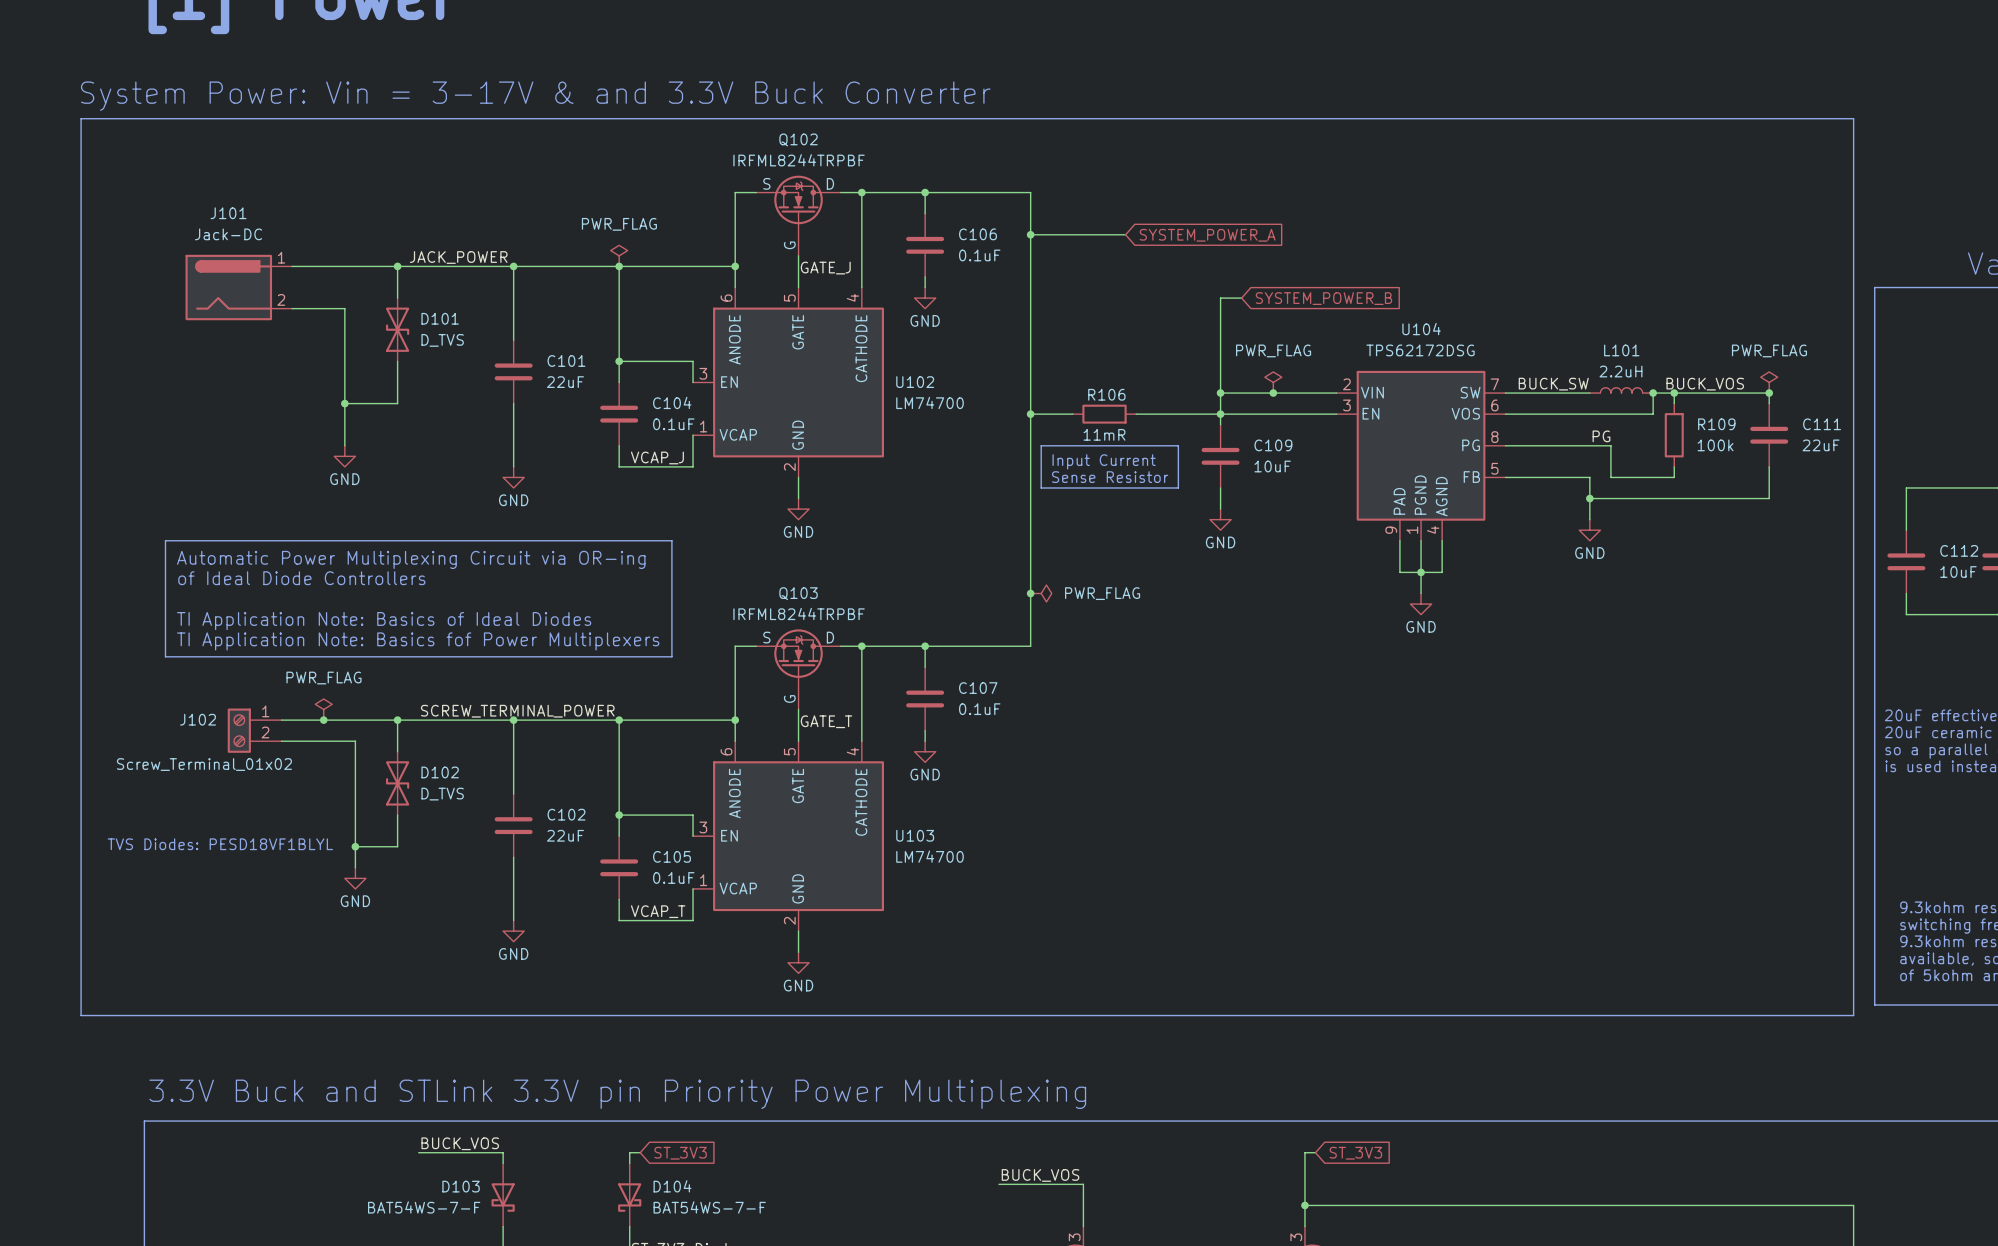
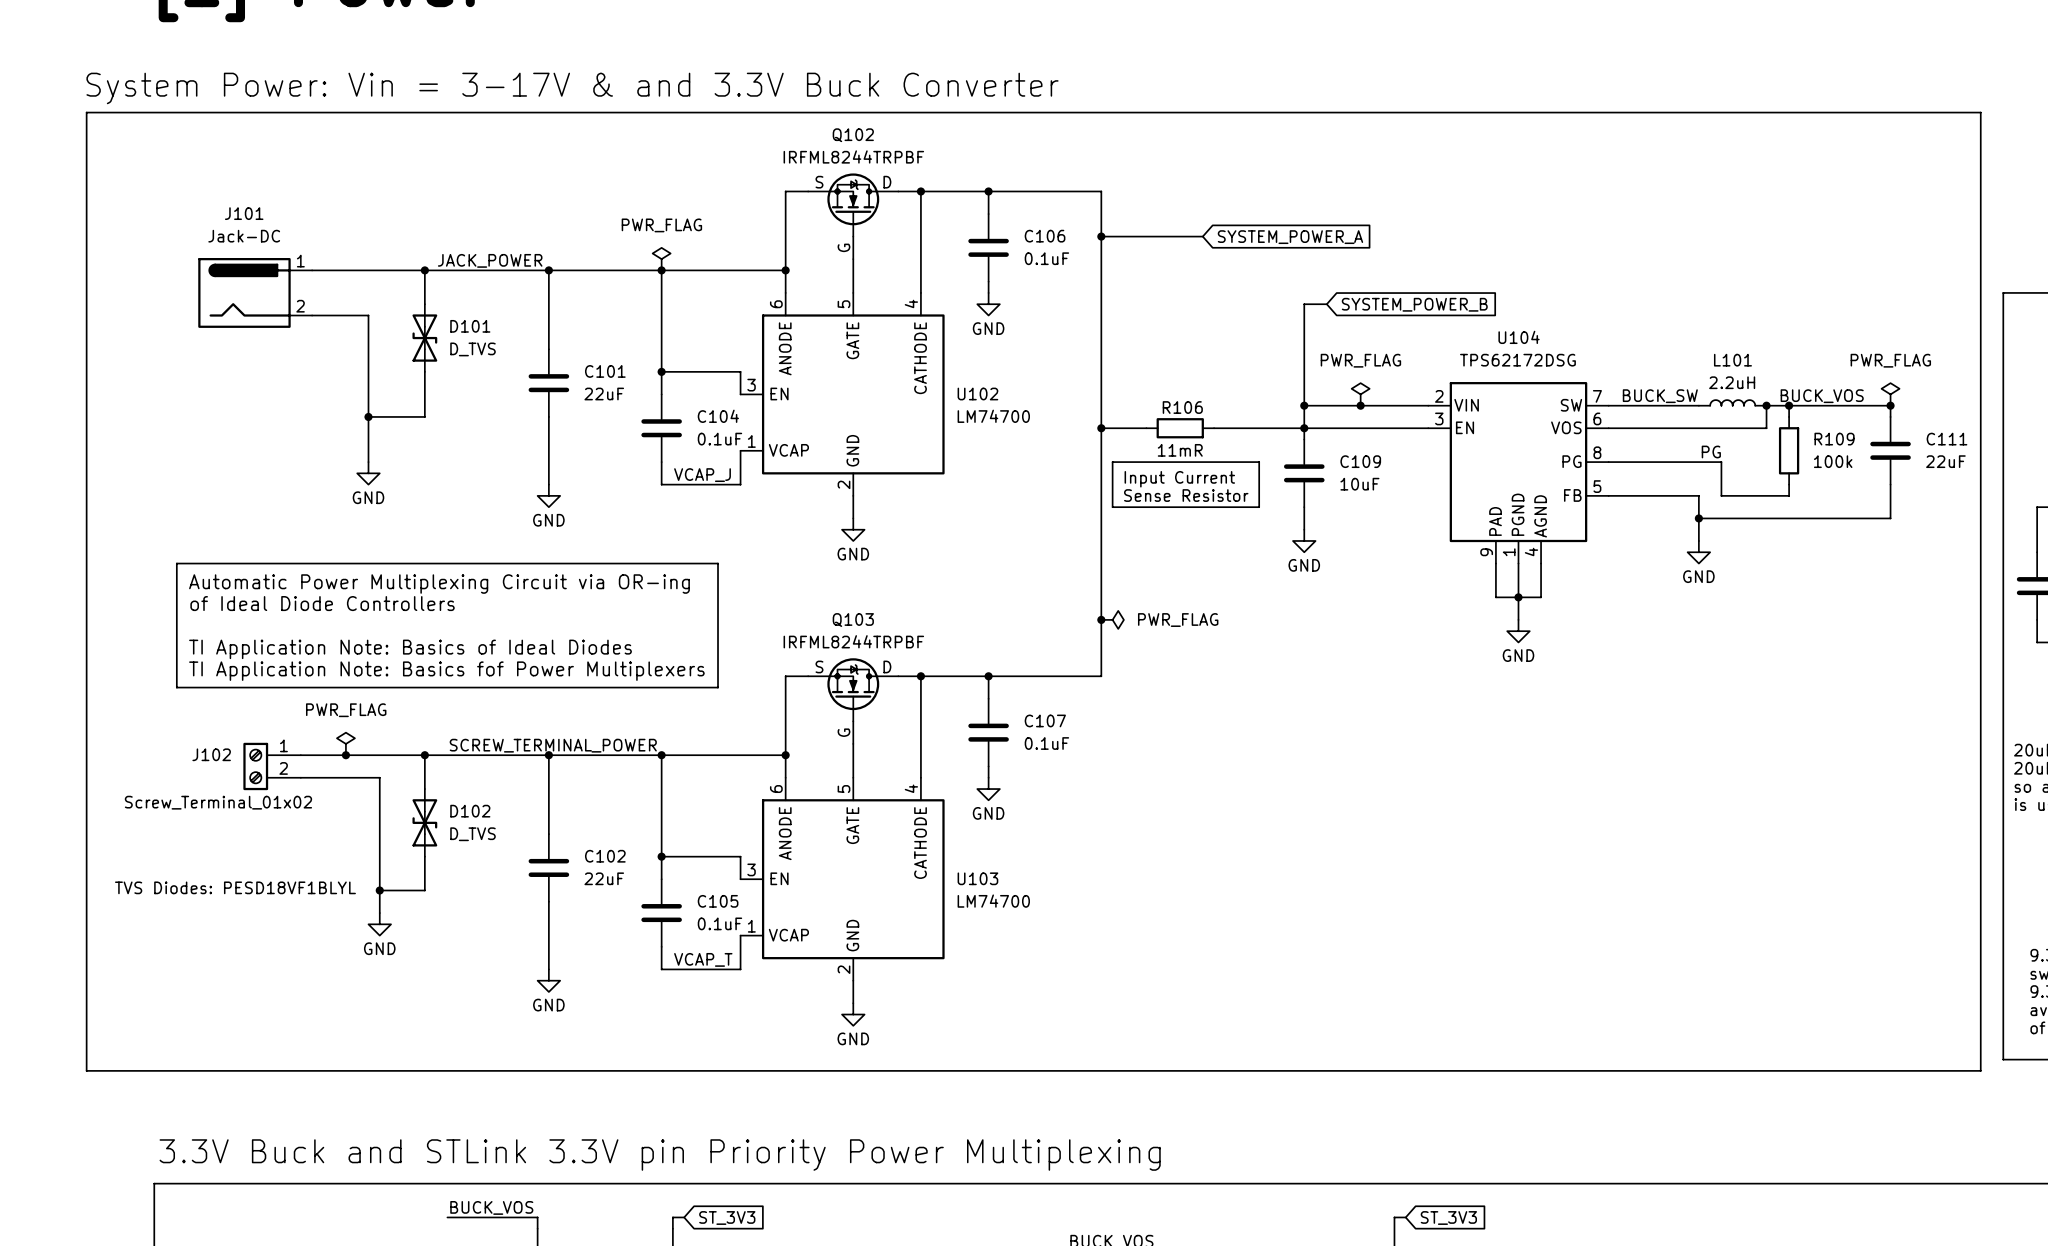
label: GATE_J (825, 268) -> none
label: GATE_T (826, 721) -> none

